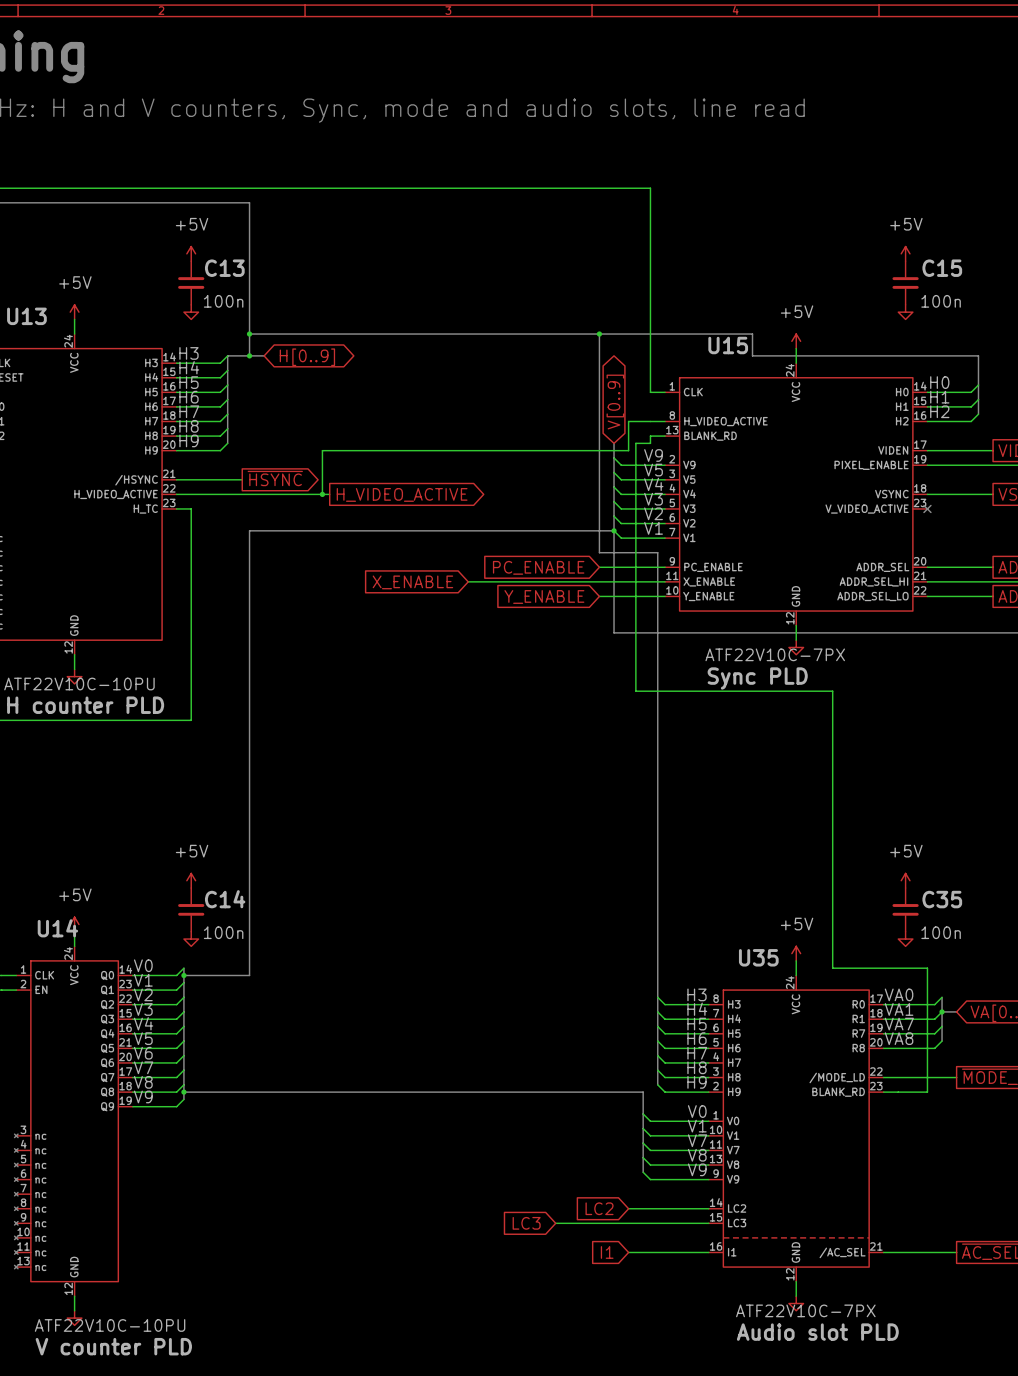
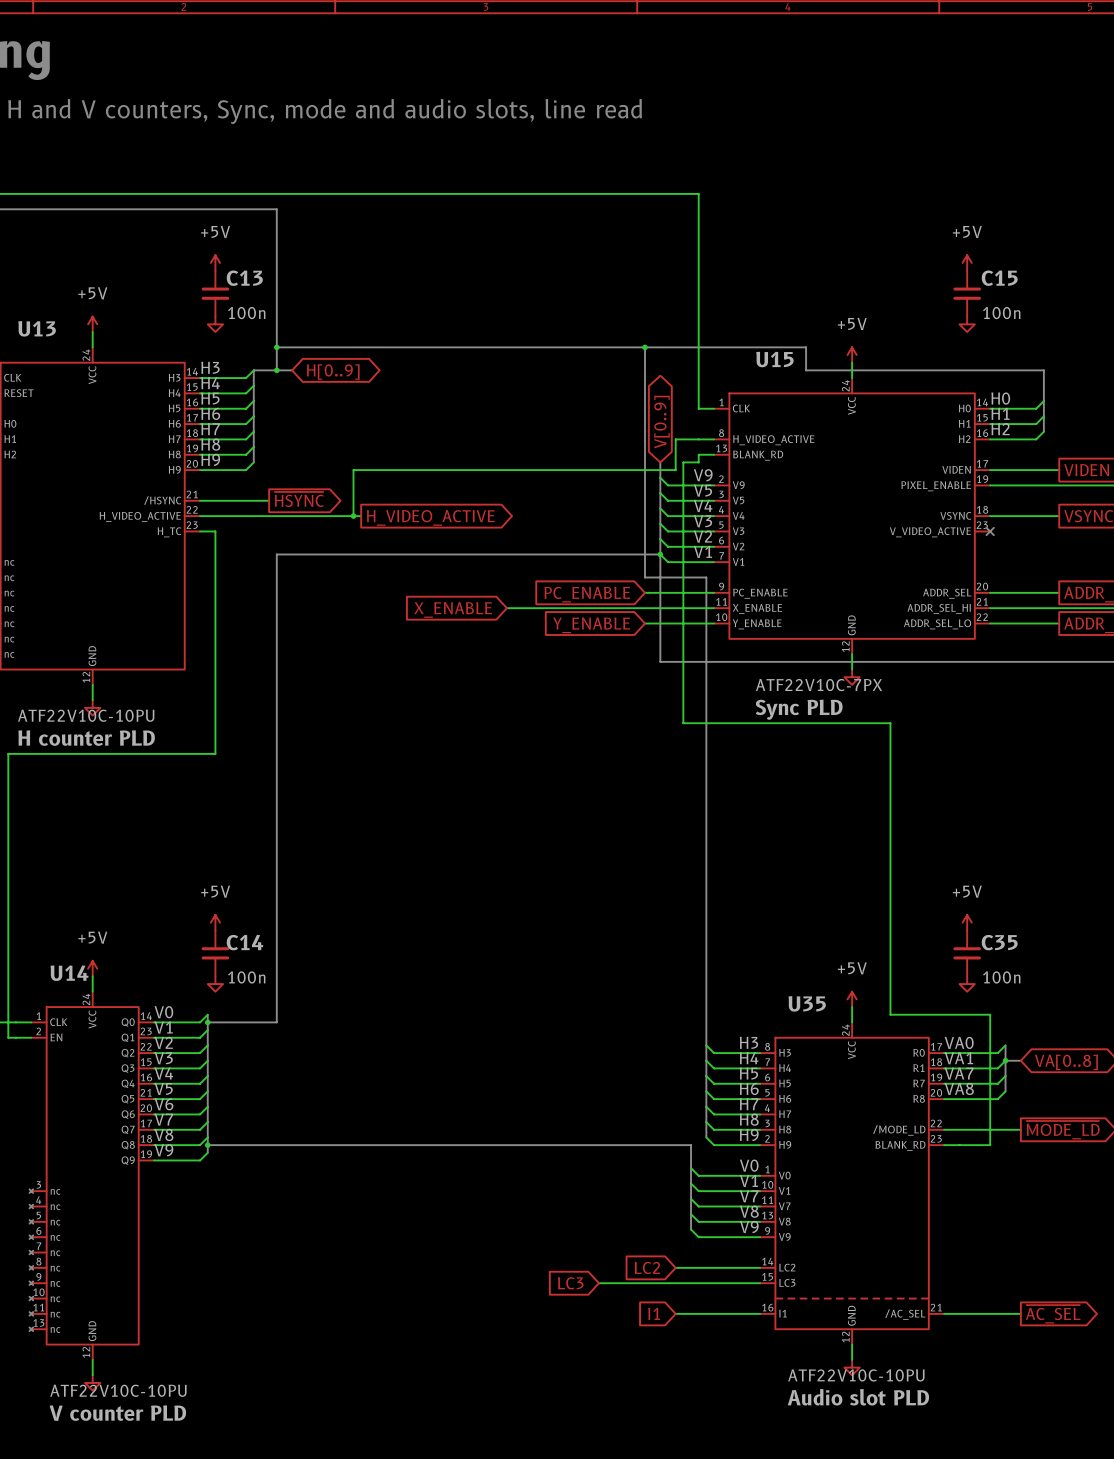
U35 value: ATF22V10C-7PX (805, 1310) -> ATF22V10C-10PU (856, 1375)

